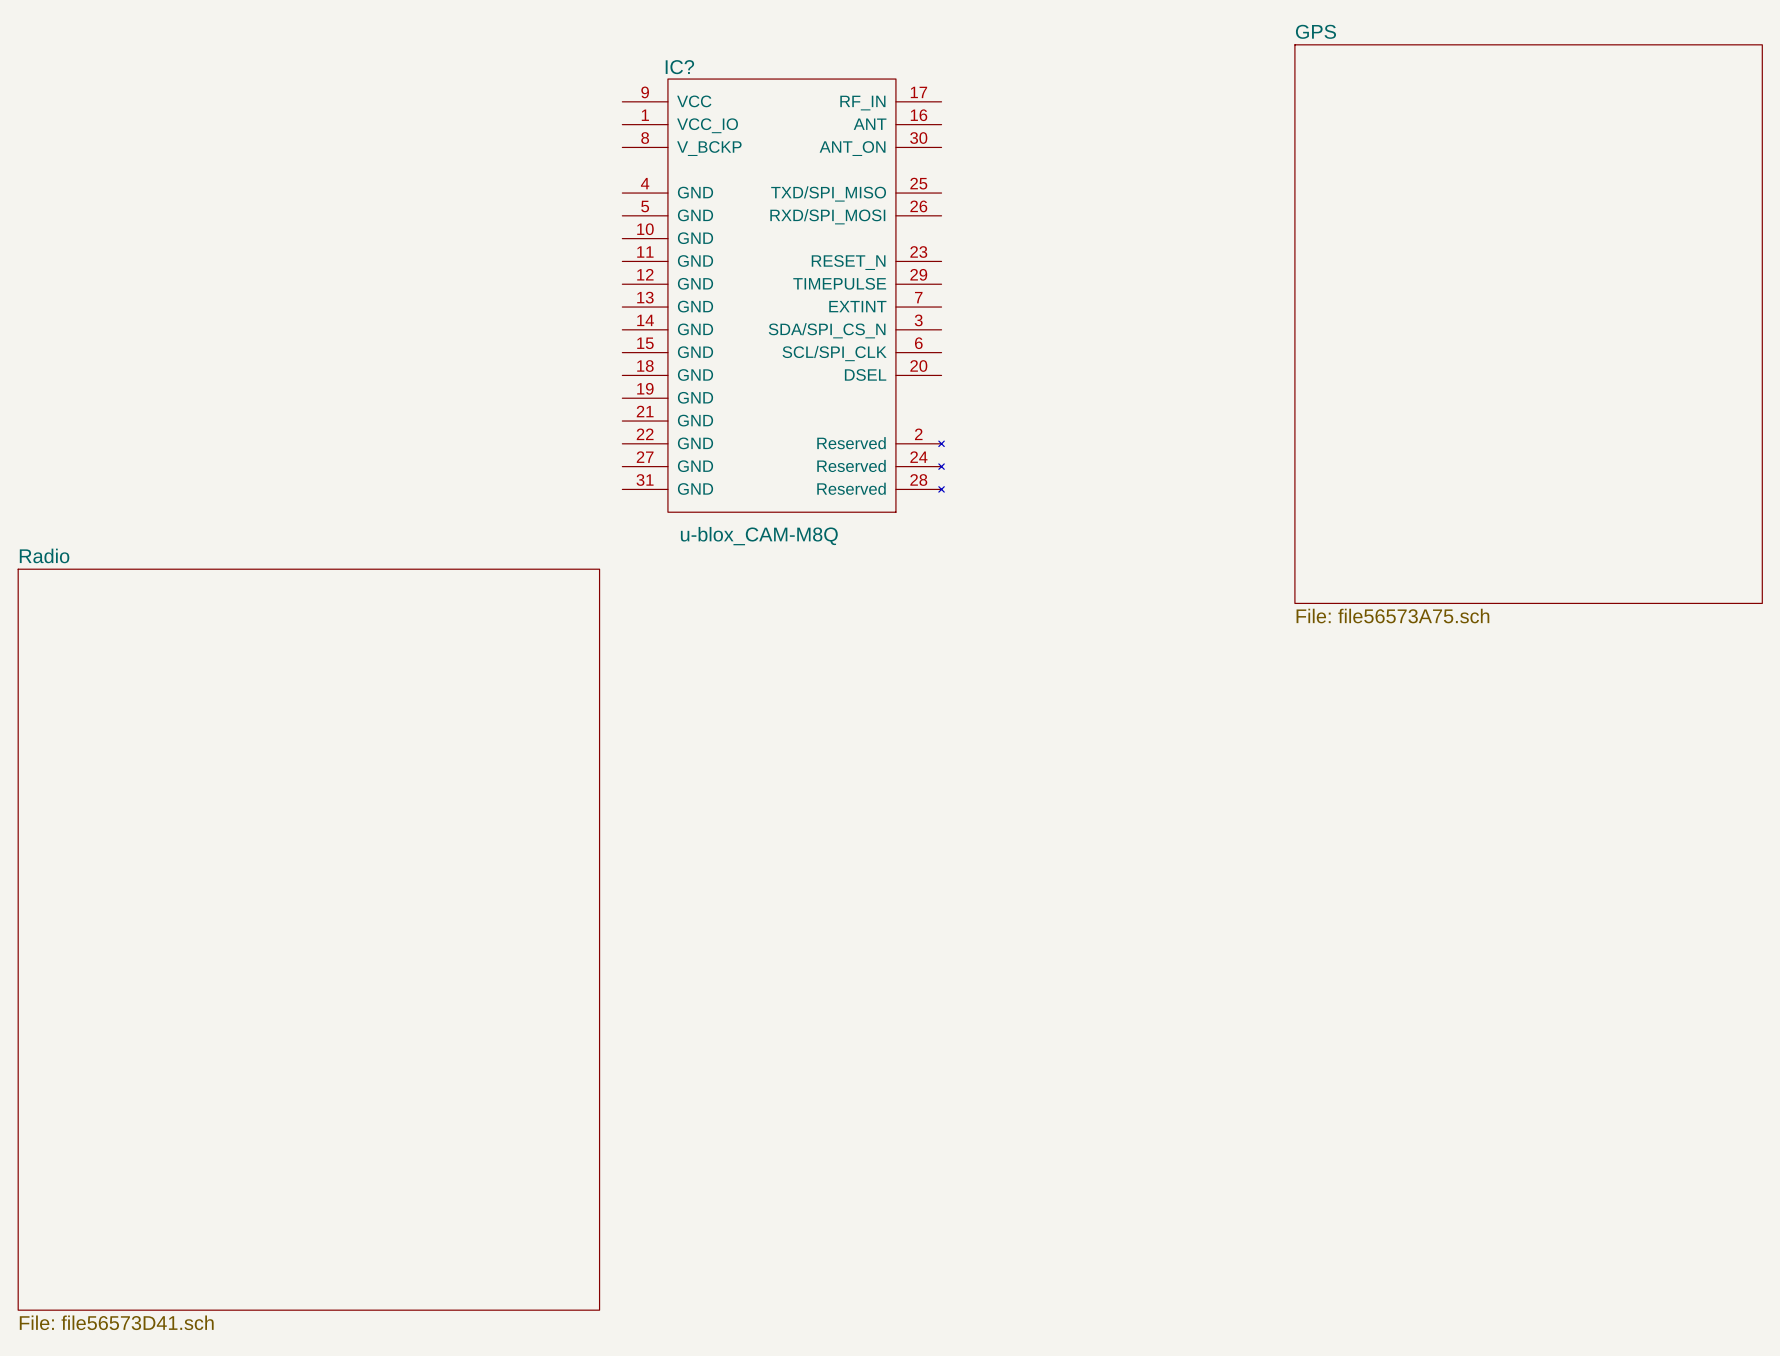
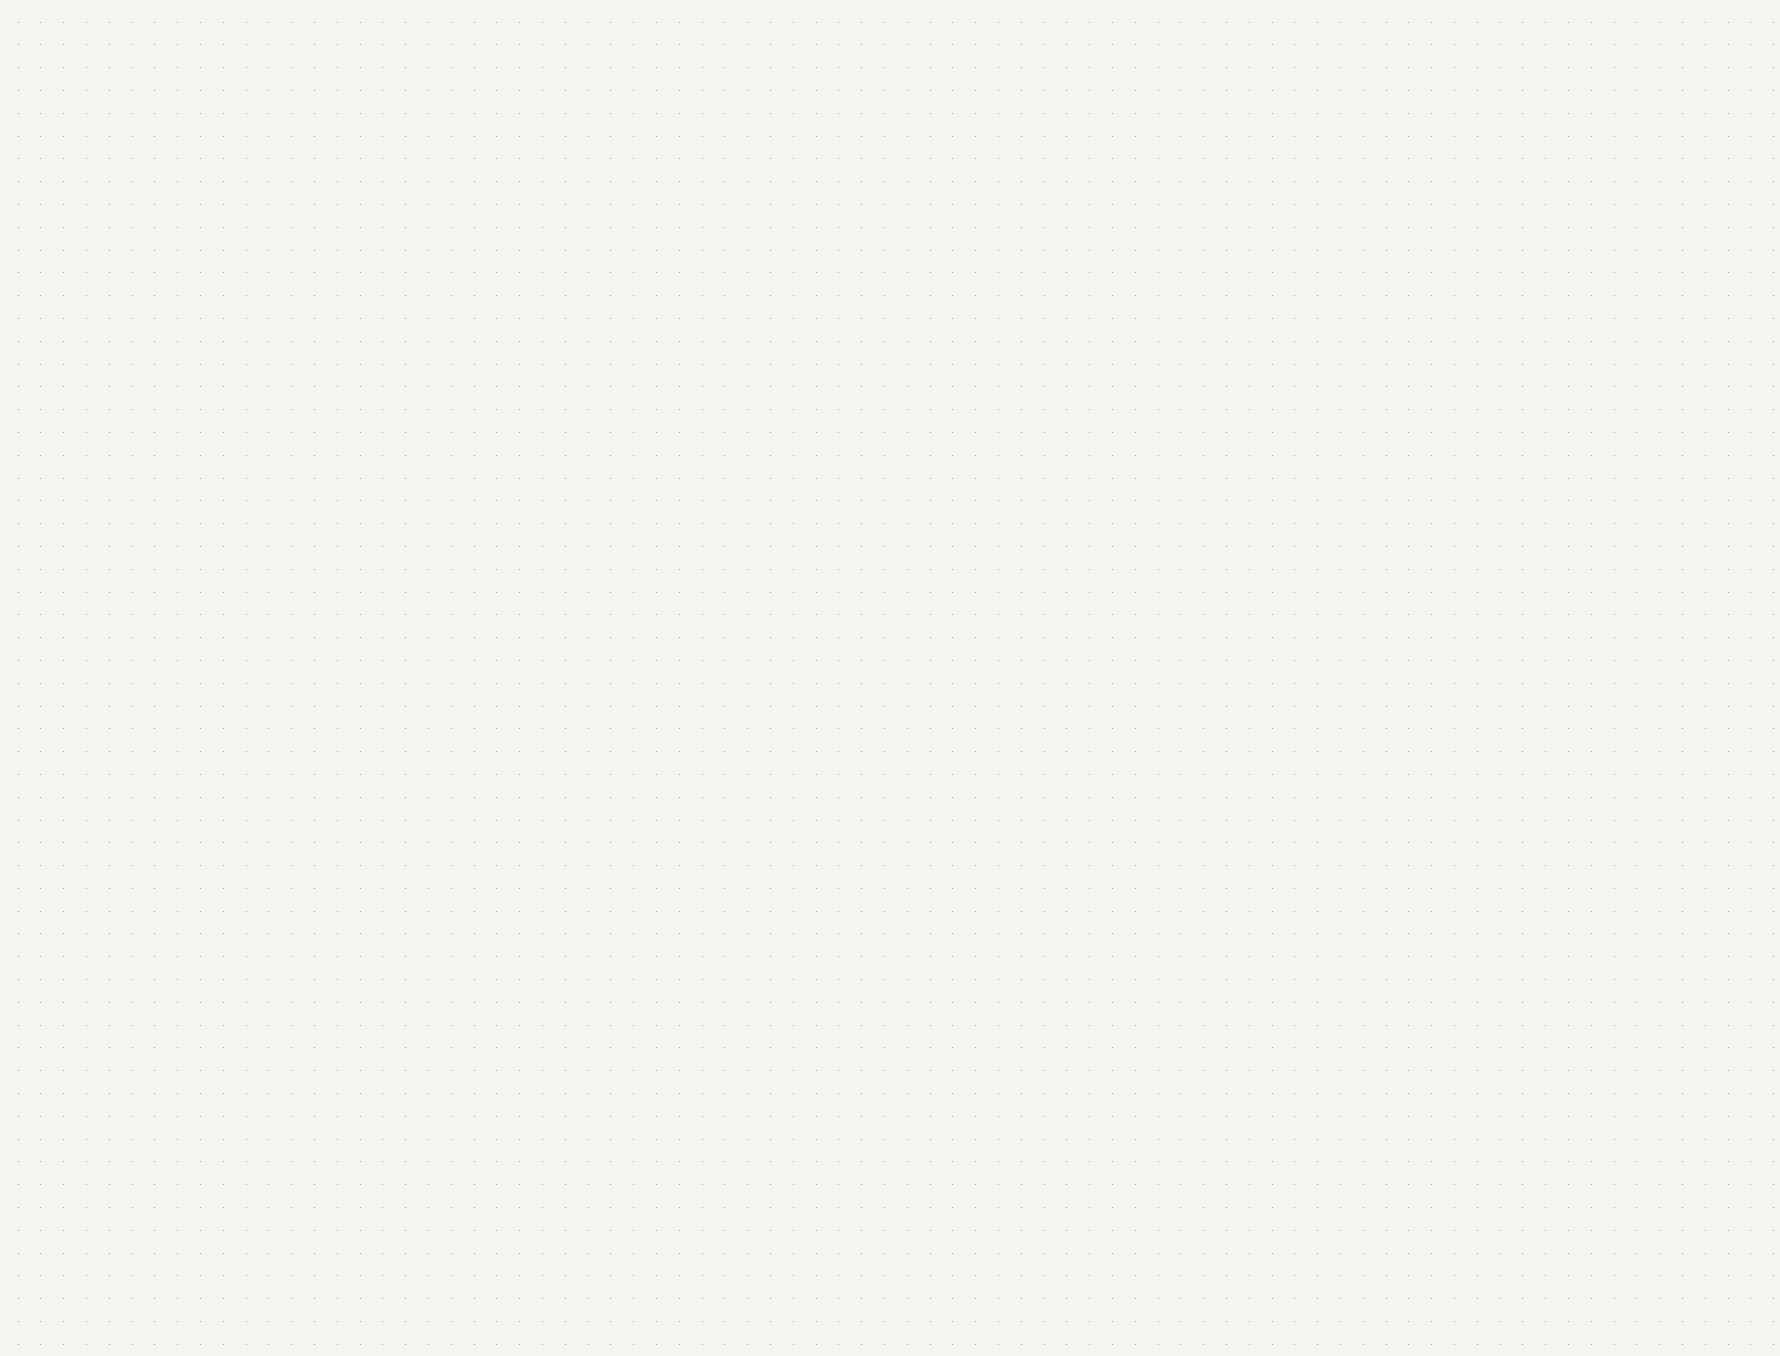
IC?: u-blox_CAM-M8Q (783, 295) -> none
sheet GPS: File: file56573A75.sch (1528, 324) -> none
sheet Radio: File: file56573D41.sch (308, 939) -> none

